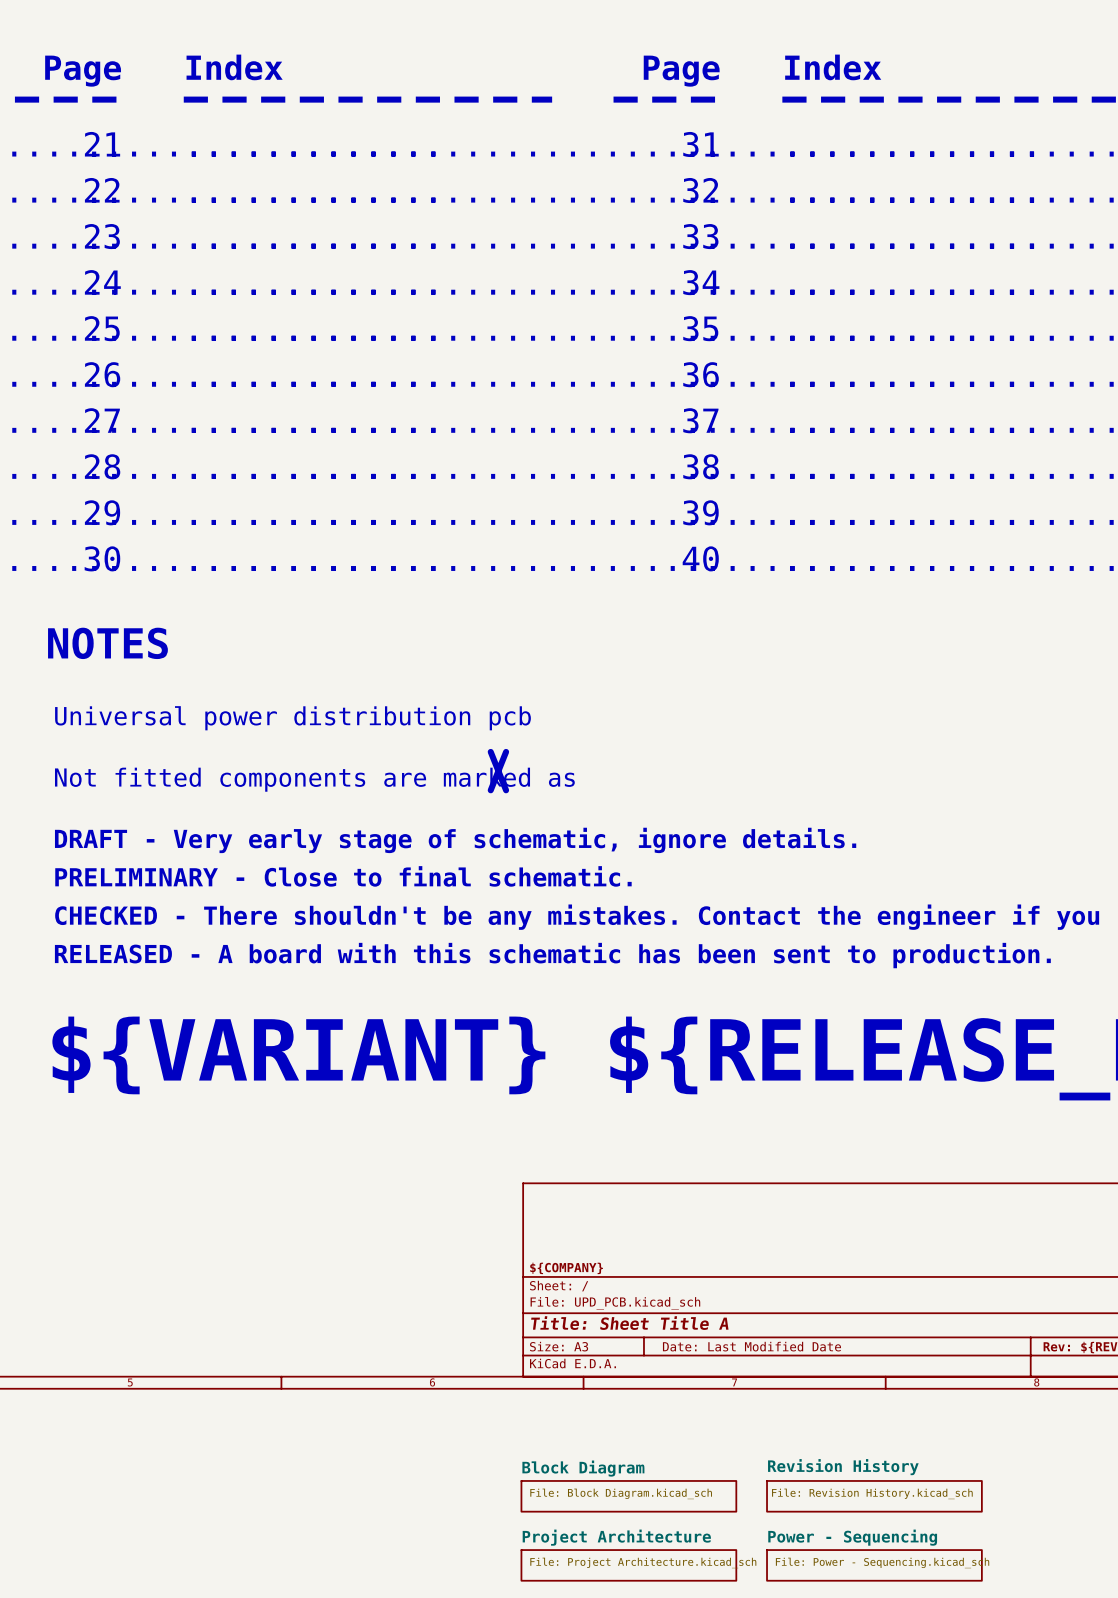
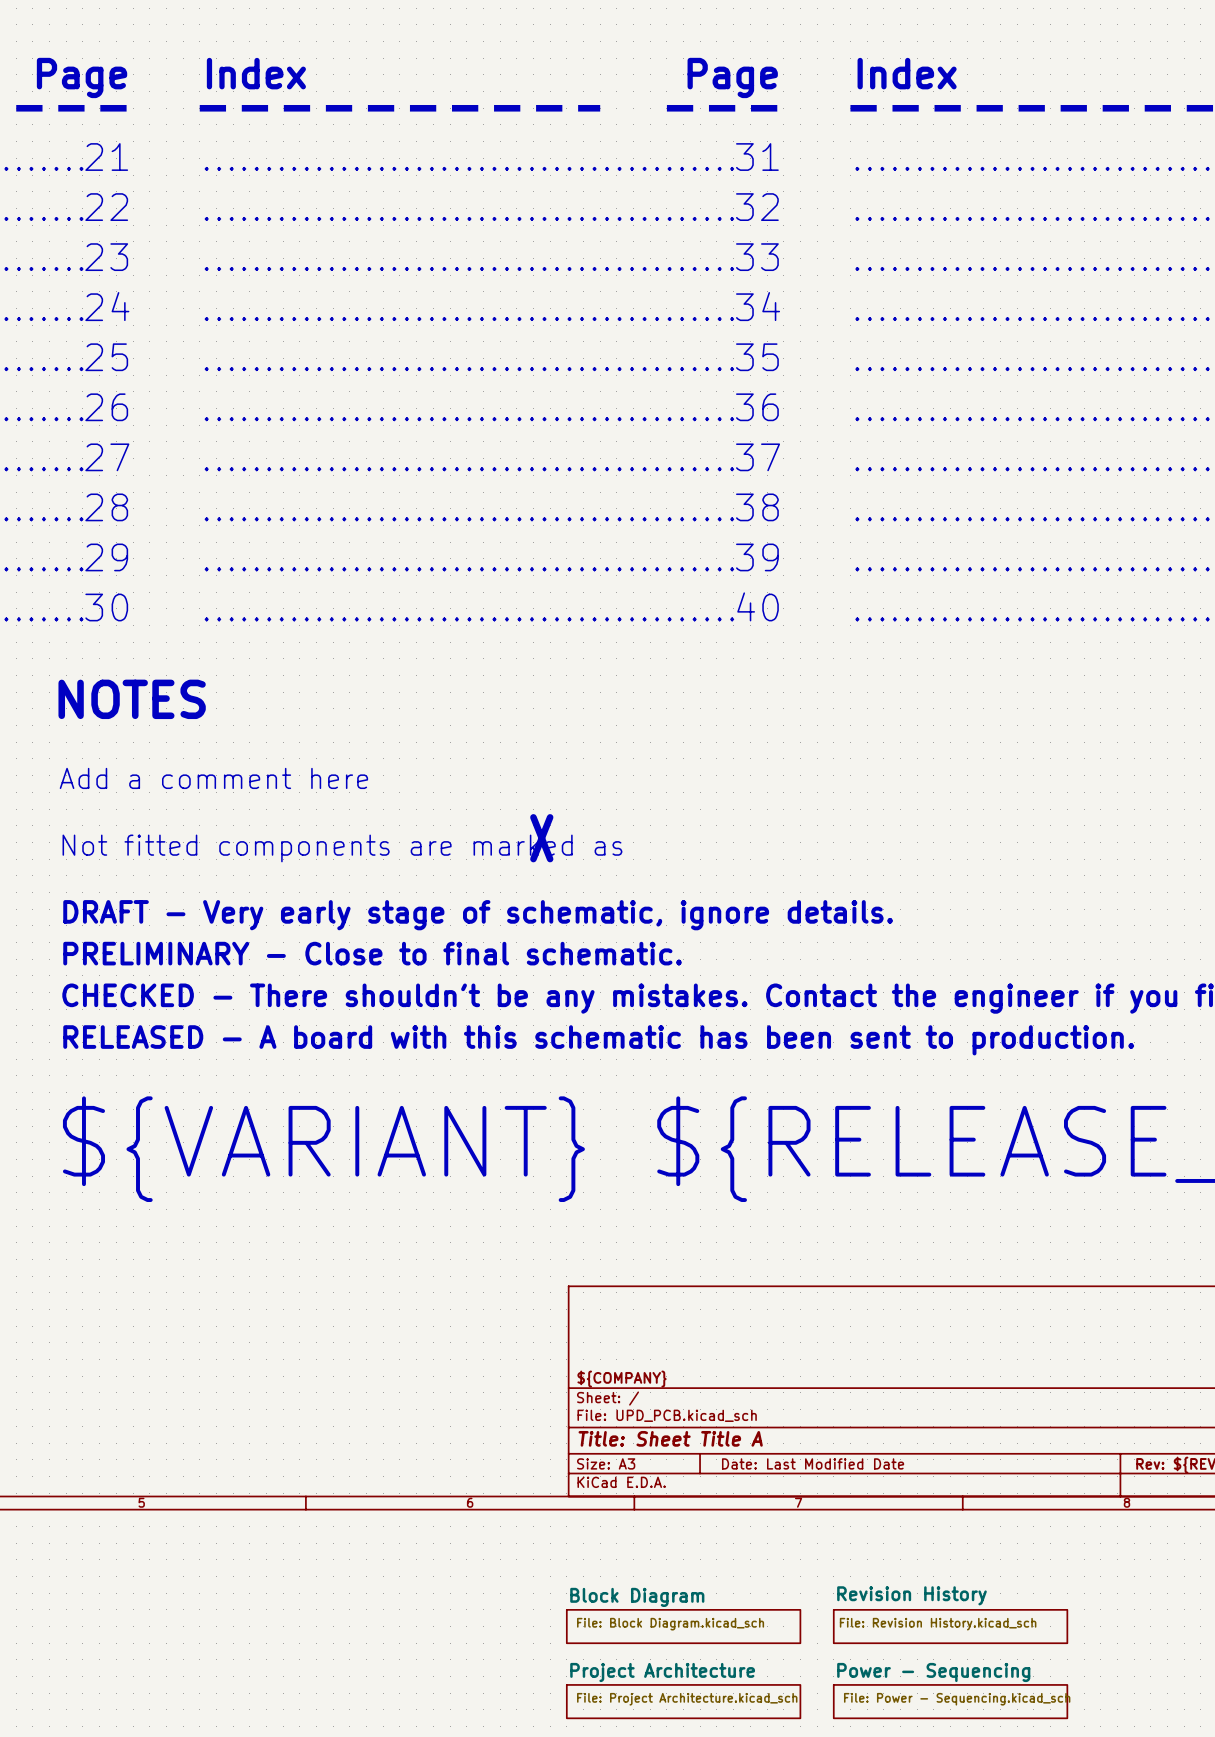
text: Universal power distribution pcb (292, 718) -> Add a comment here (213, 778)

